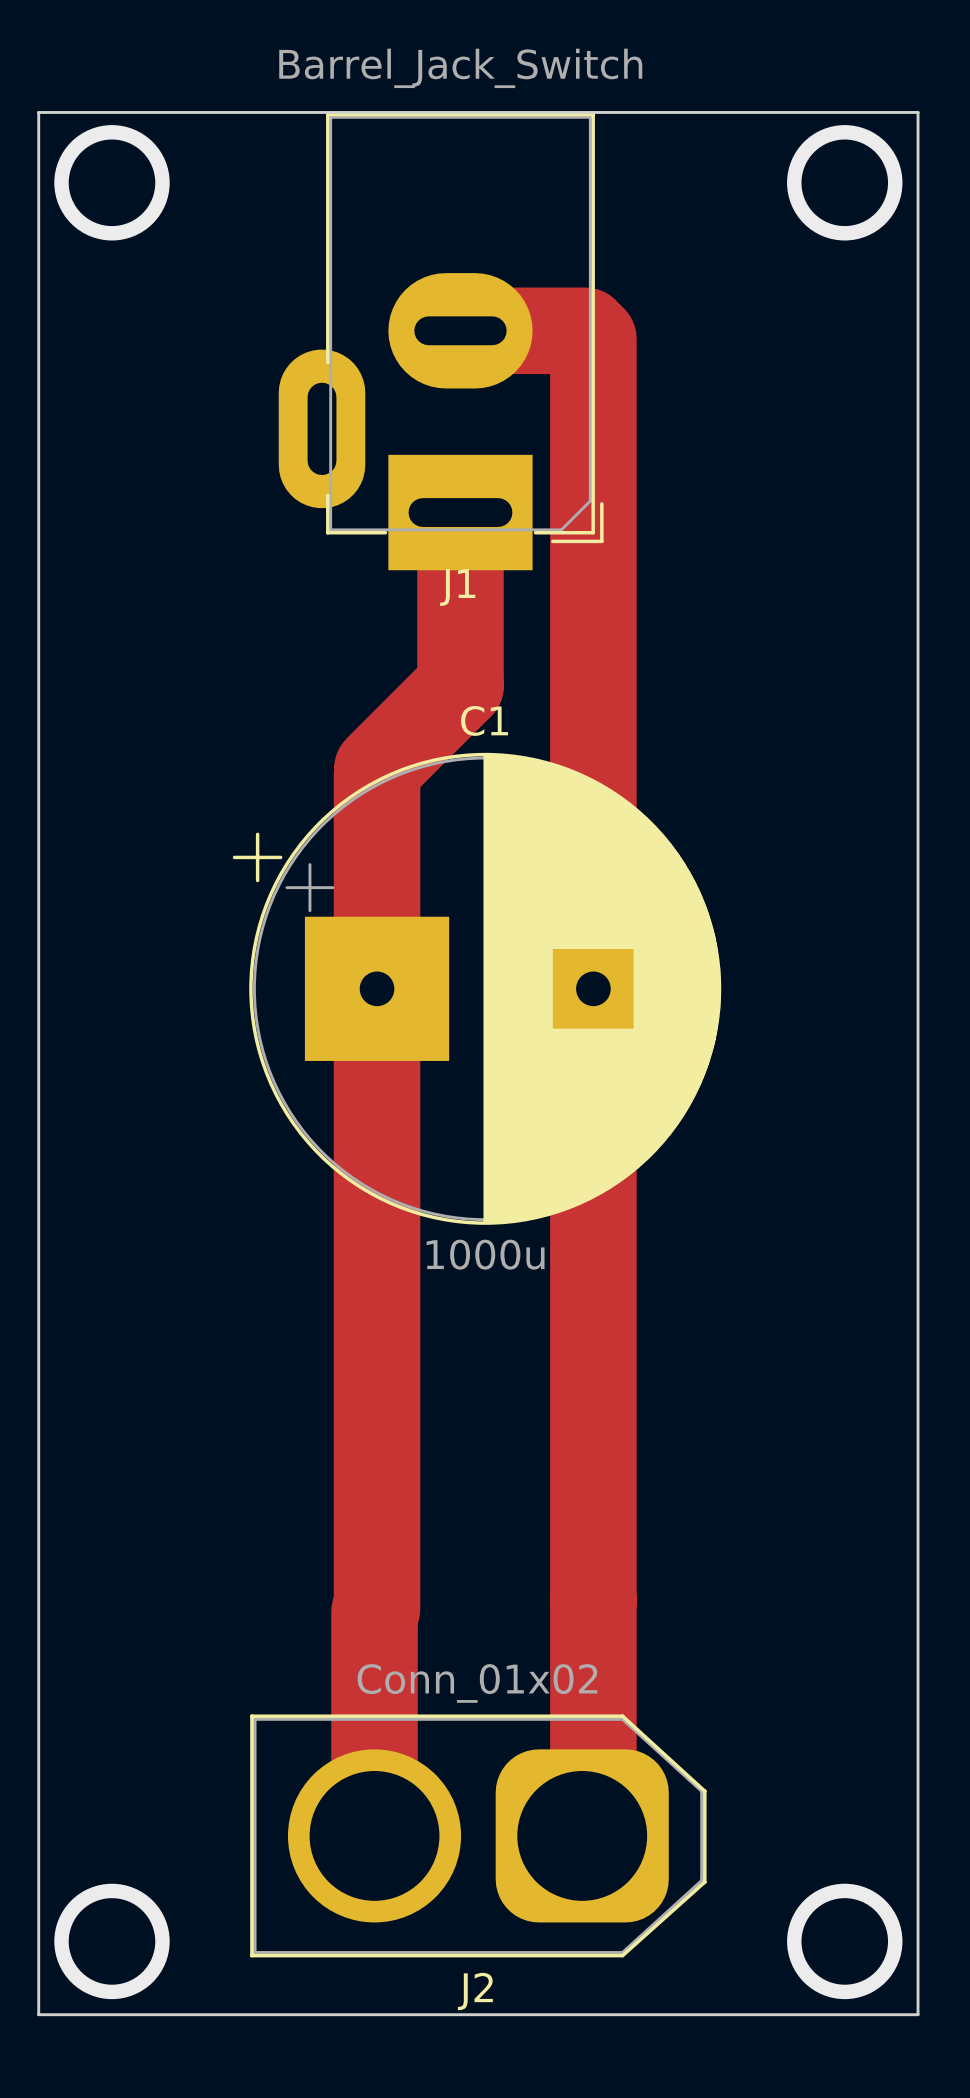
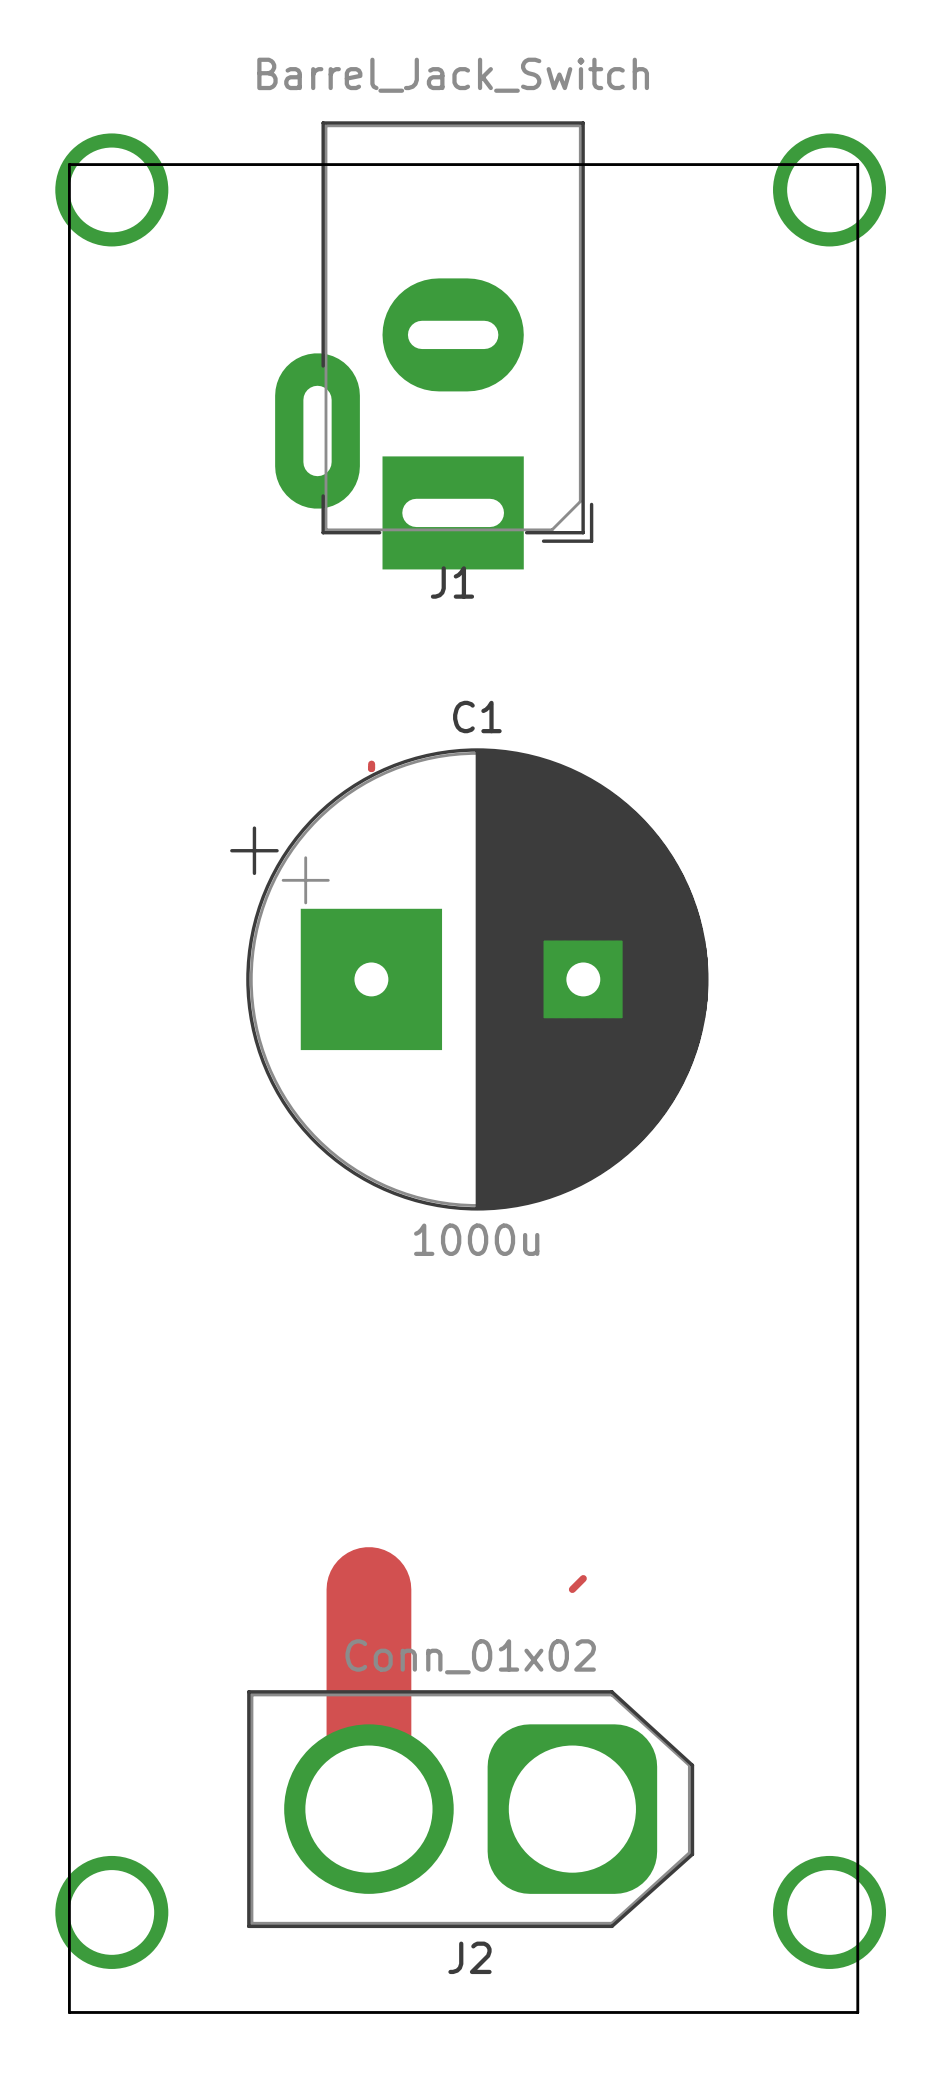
board edge: (38, 112) (918, 112) (918, 2014) (38, 2014) (38, 112) -> (69, 164) (69, 2012) (857, 2012) (857, 164) (69, 164)
track: (460, 330) (585, 330) (593, 338) (593, 1824) -> none
track: (460, 512) (460, 685) (377, 769) -> none
track: (377, 773) (377, 1609) -> none

